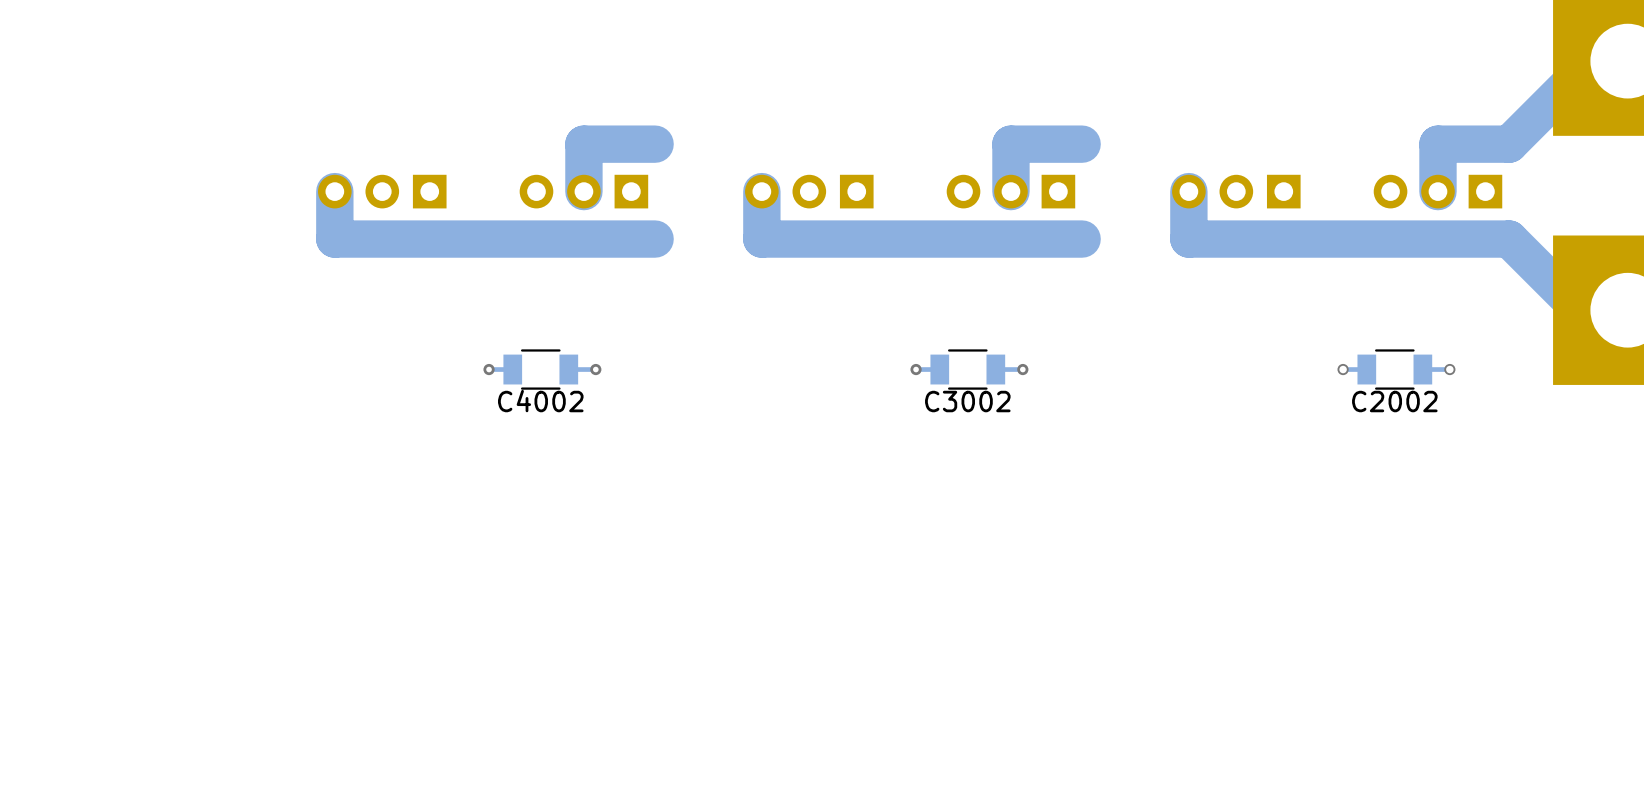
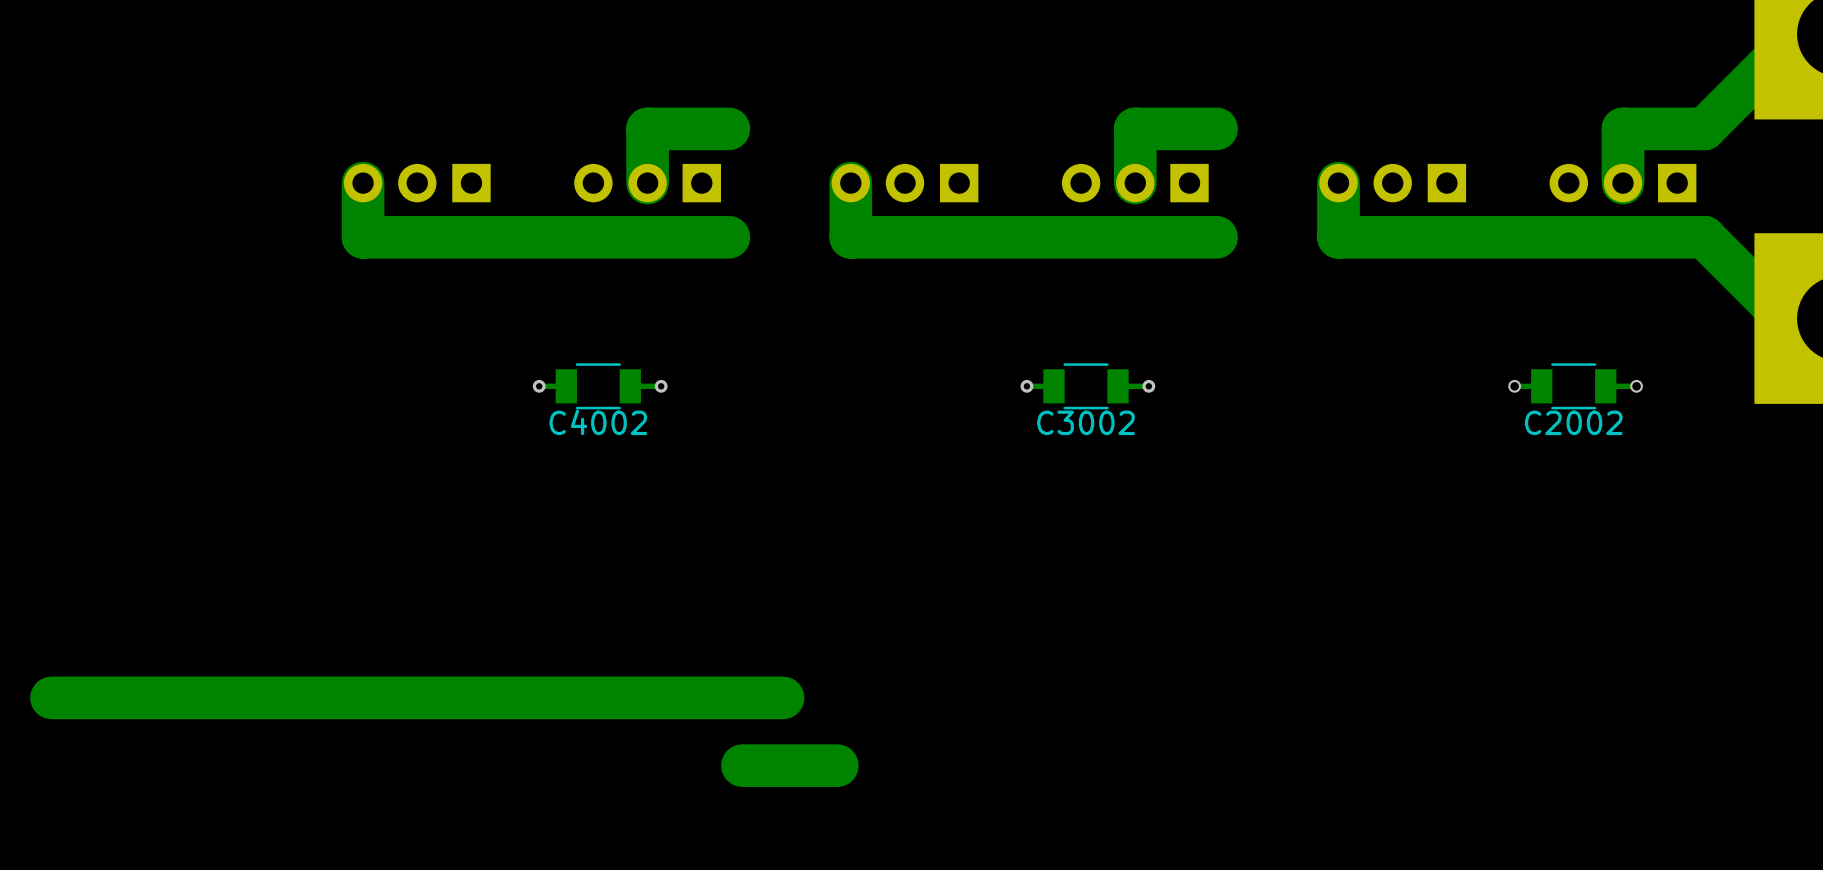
track: none -> (783, 697) (51, 697)
track: none -> (837, 765) (742, 765)

